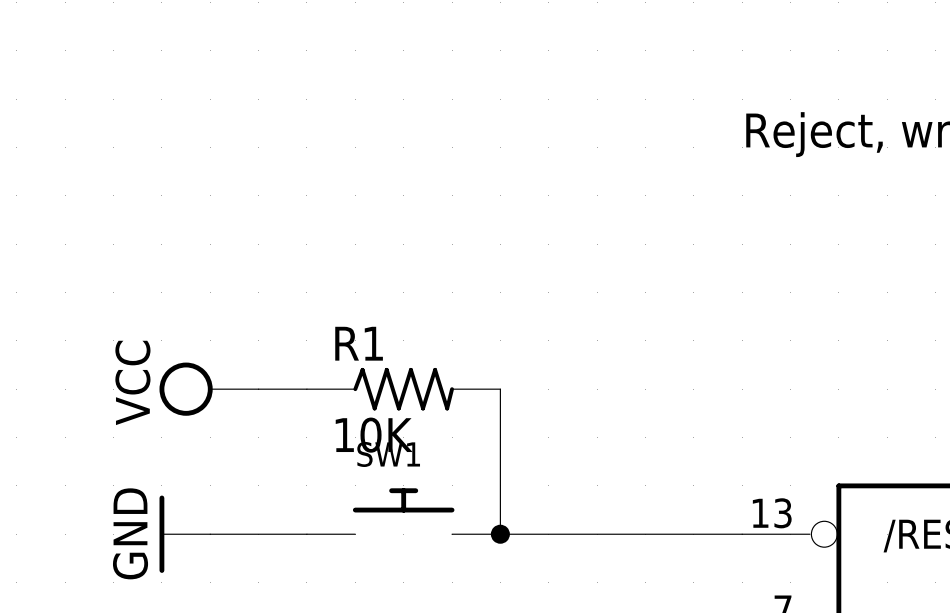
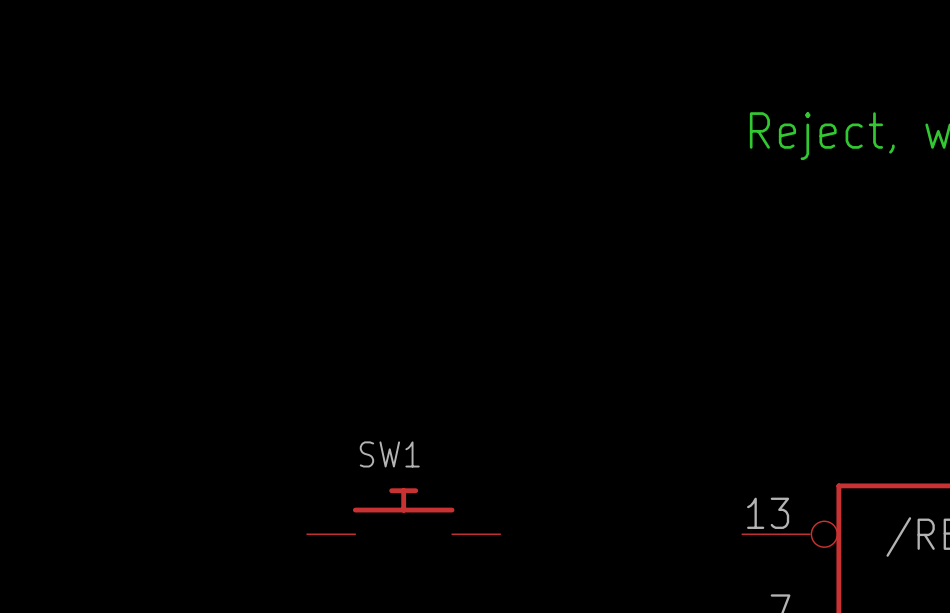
power symbol: VCC (209, 389) -> none
wire: (258, 389) (306, 389) -> none
R1: 10K (403, 389) -> none
wire: (500, 389) (500, 534) (742, 534) -> none
power symbol: GND (184, 534) -> none
wire: (210, 534) (306, 534) -> none
junction: (500, 534) -> none

